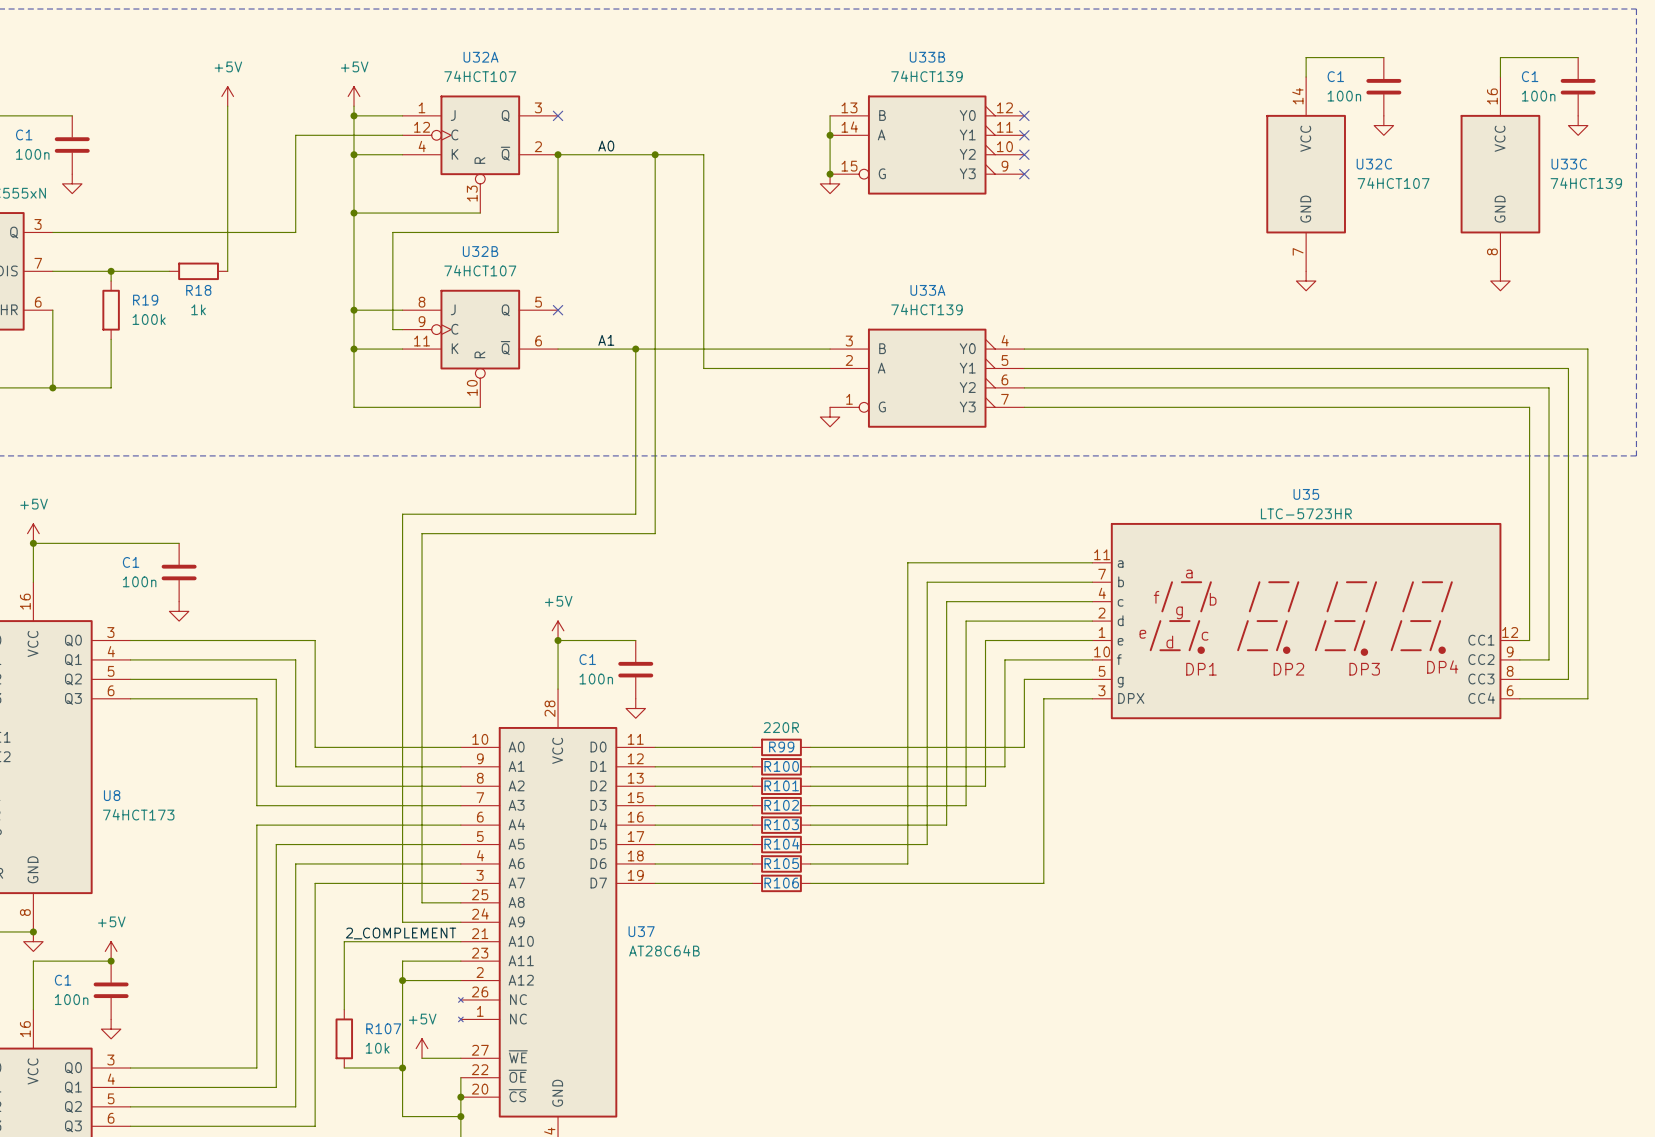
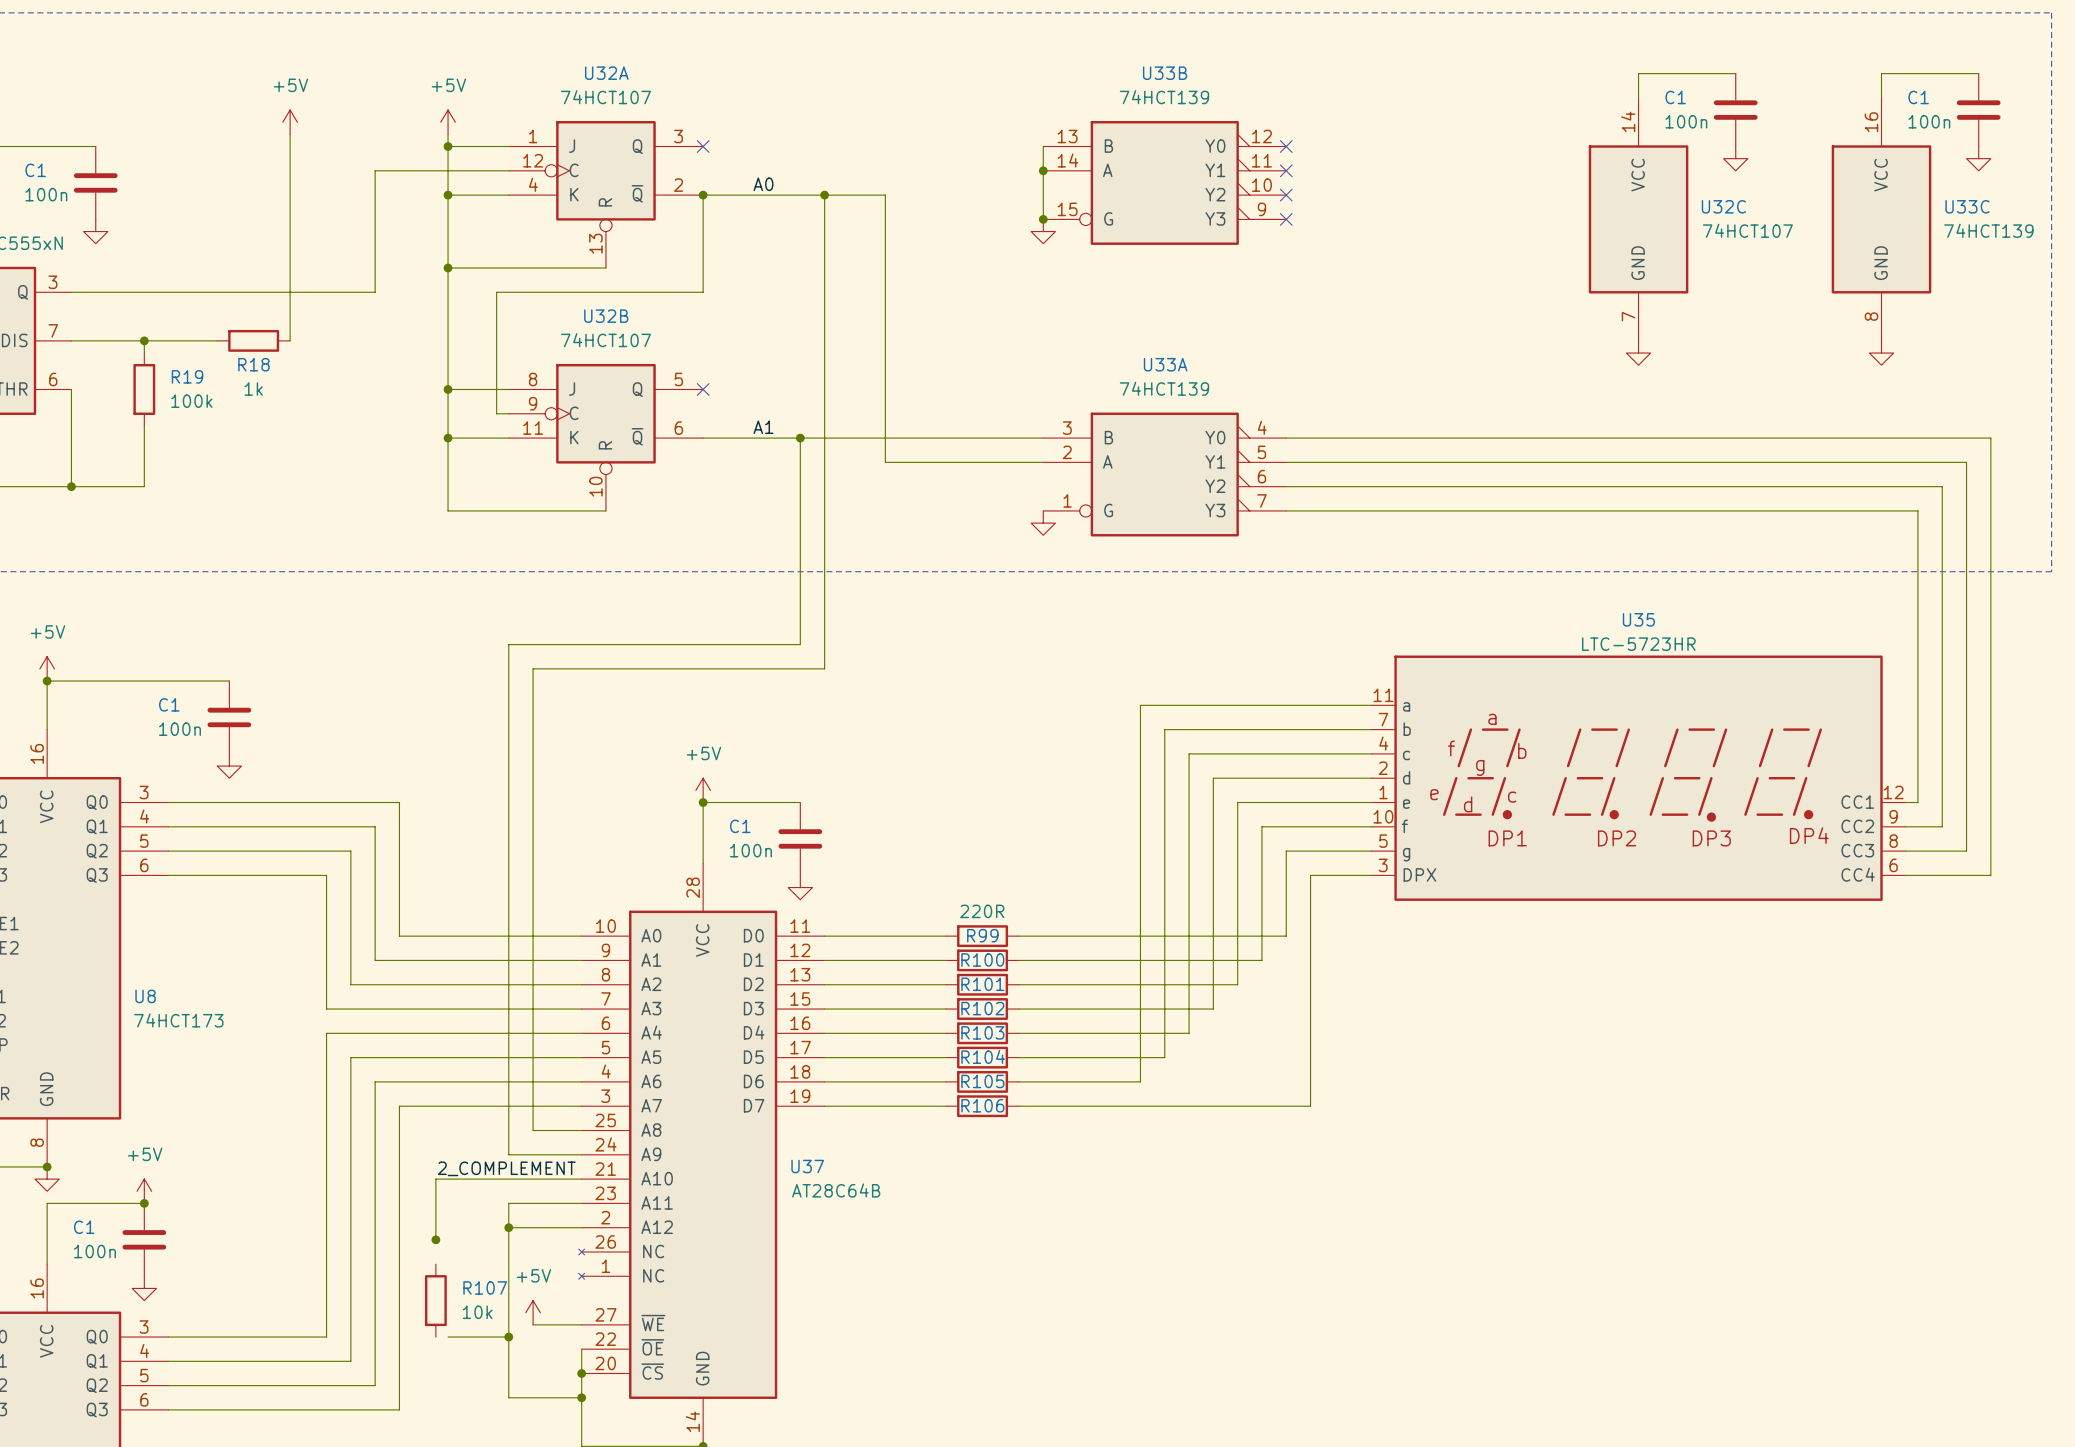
wire: (344, 990) (344, 1009) -> none
junction: none -> (435, 1239)
wire: (344, 1068) (354, 1068) -> none

